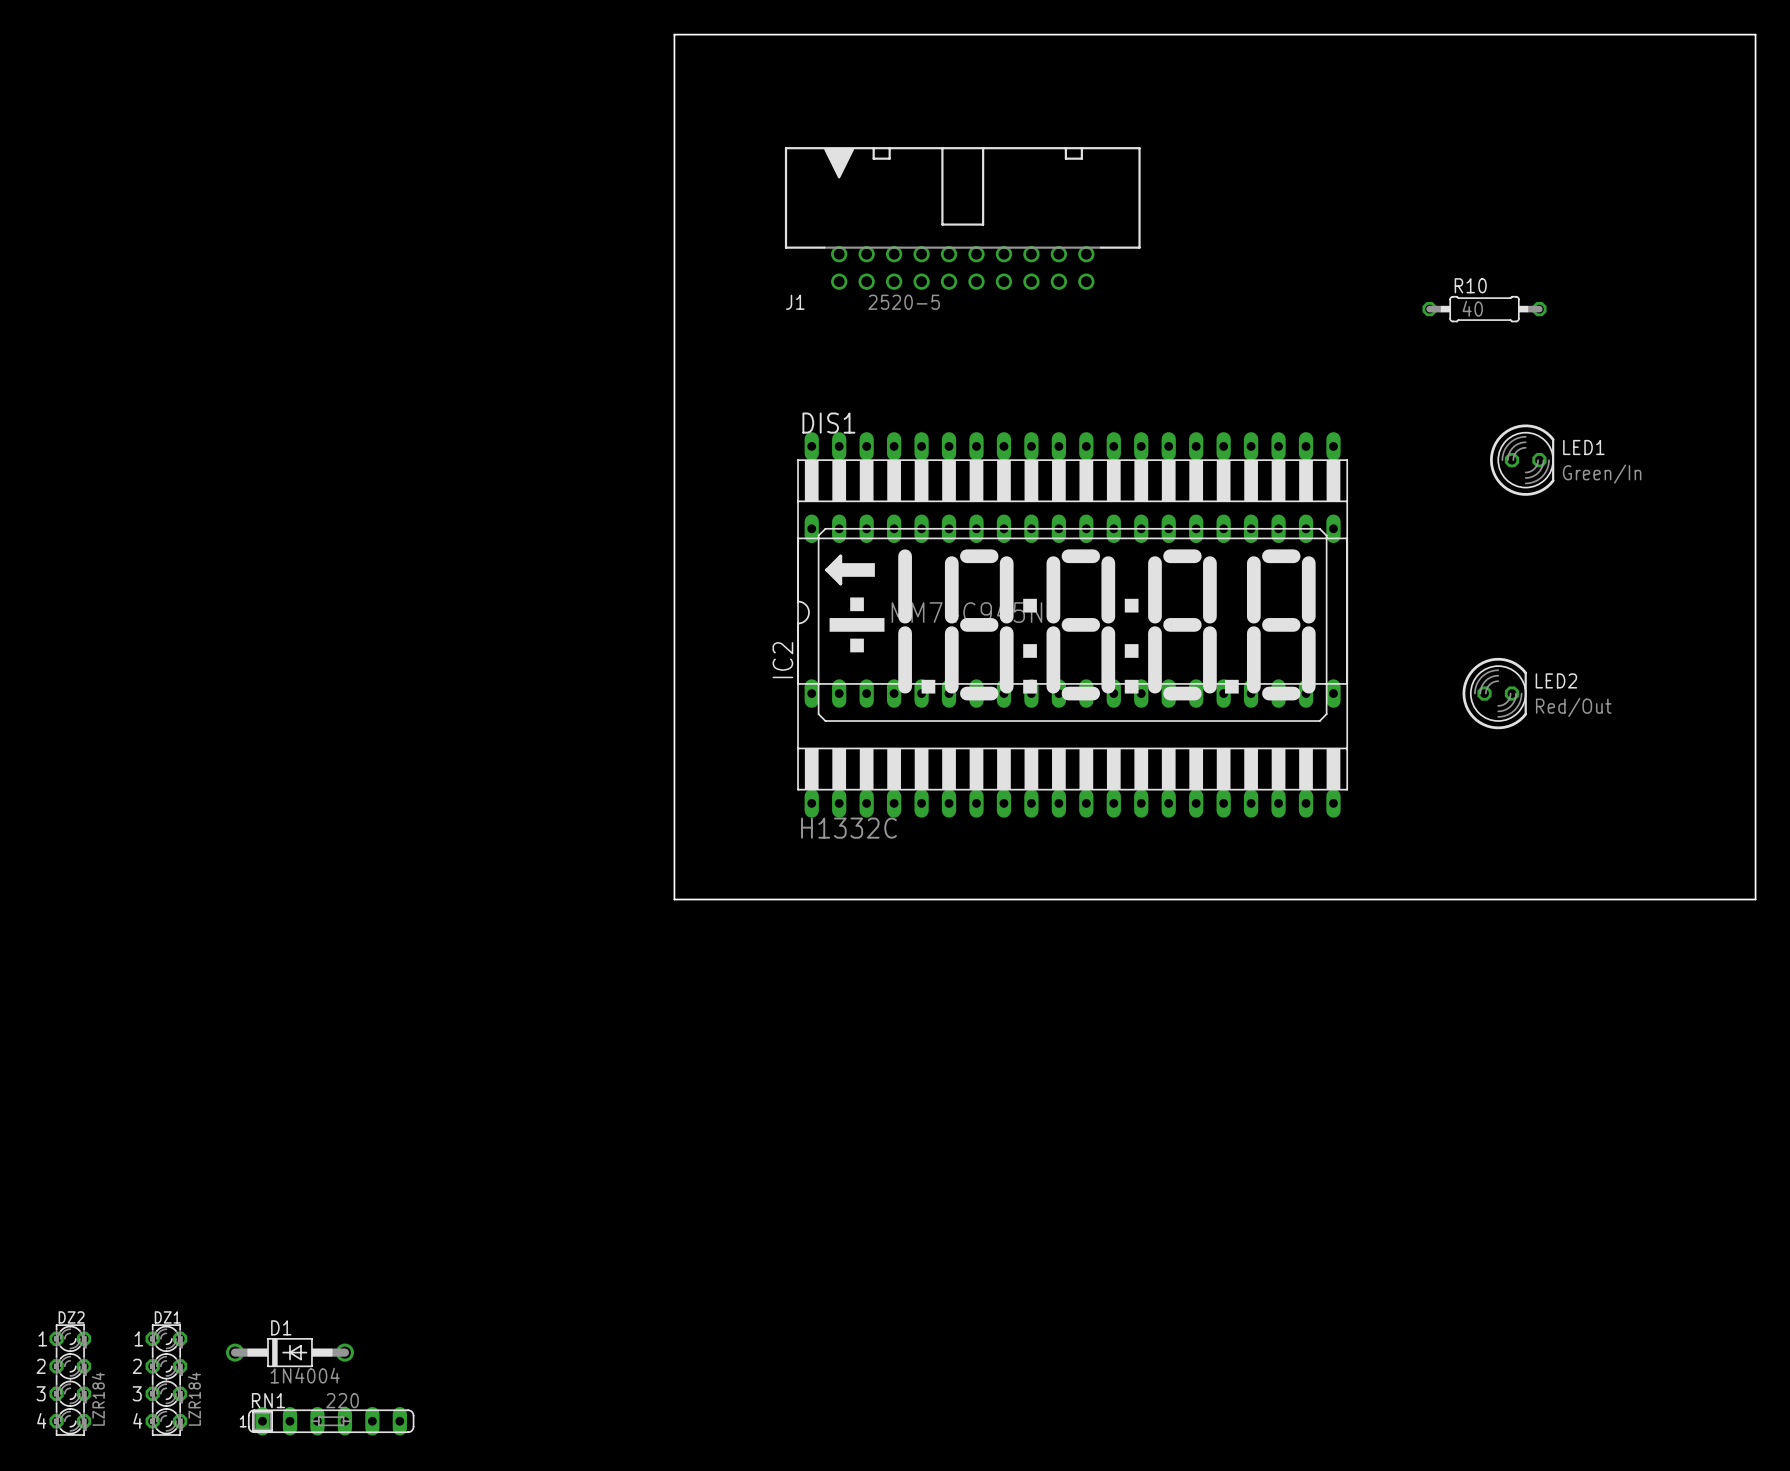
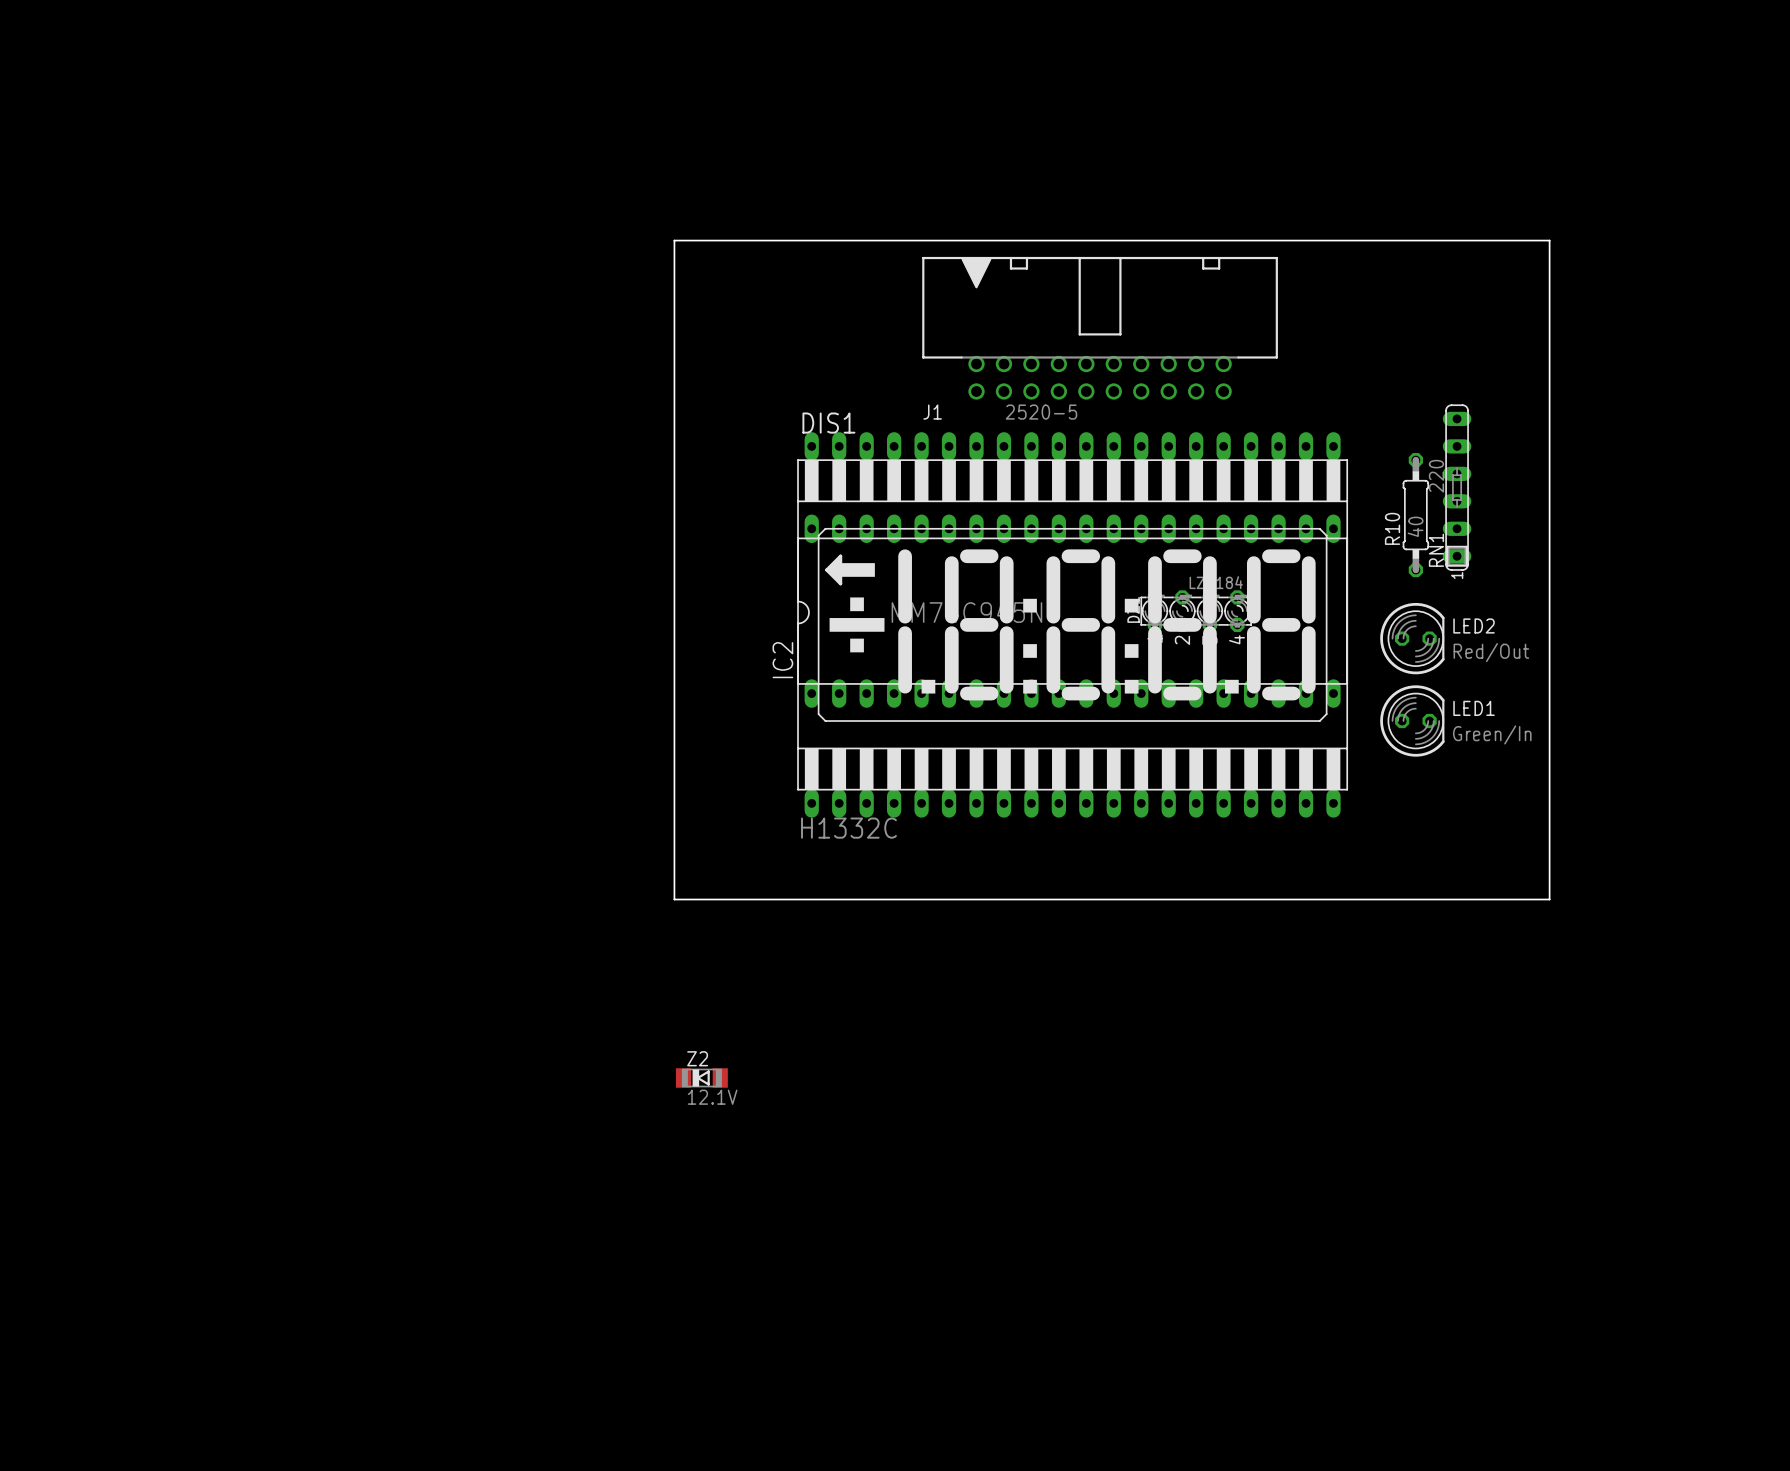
J1 position: (962, 218) -> (1100, 328)
board edge: (674, 240) (674, 34) (1755, 34) (1755, 899) (1549, 899) -> (674, 240) (1549, 240) (1549, 899)
R10 name position: R10 (1470, 285) -> R10 (1392, 528)
R10 rotation: 0° (1484, 309) -> 90° clockwise (1415, 515)
R10 position: (1484, 309) -> (1415, 515)
LED1 position: (1522, 460) -> (1412, 721)
LED2 position: (1494, 693) -> (1412, 638)
Z2: none -> 12.1V (701, 1077)
D1: 1N4004 (289, 1352) -> none
DZ2: LZR184 (70, 1380) -> none
DZ1 rotation: 0° (166, 1380) -> 90° counterclockwise (1196, 611)
DZ1 position: (166, 1380) -> (1196, 611)
RN1 rotation: 0° (331, 1421) -> 90° counterclockwise (1457, 487)
RN1 position: (331, 1421) -> (1457, 487)

